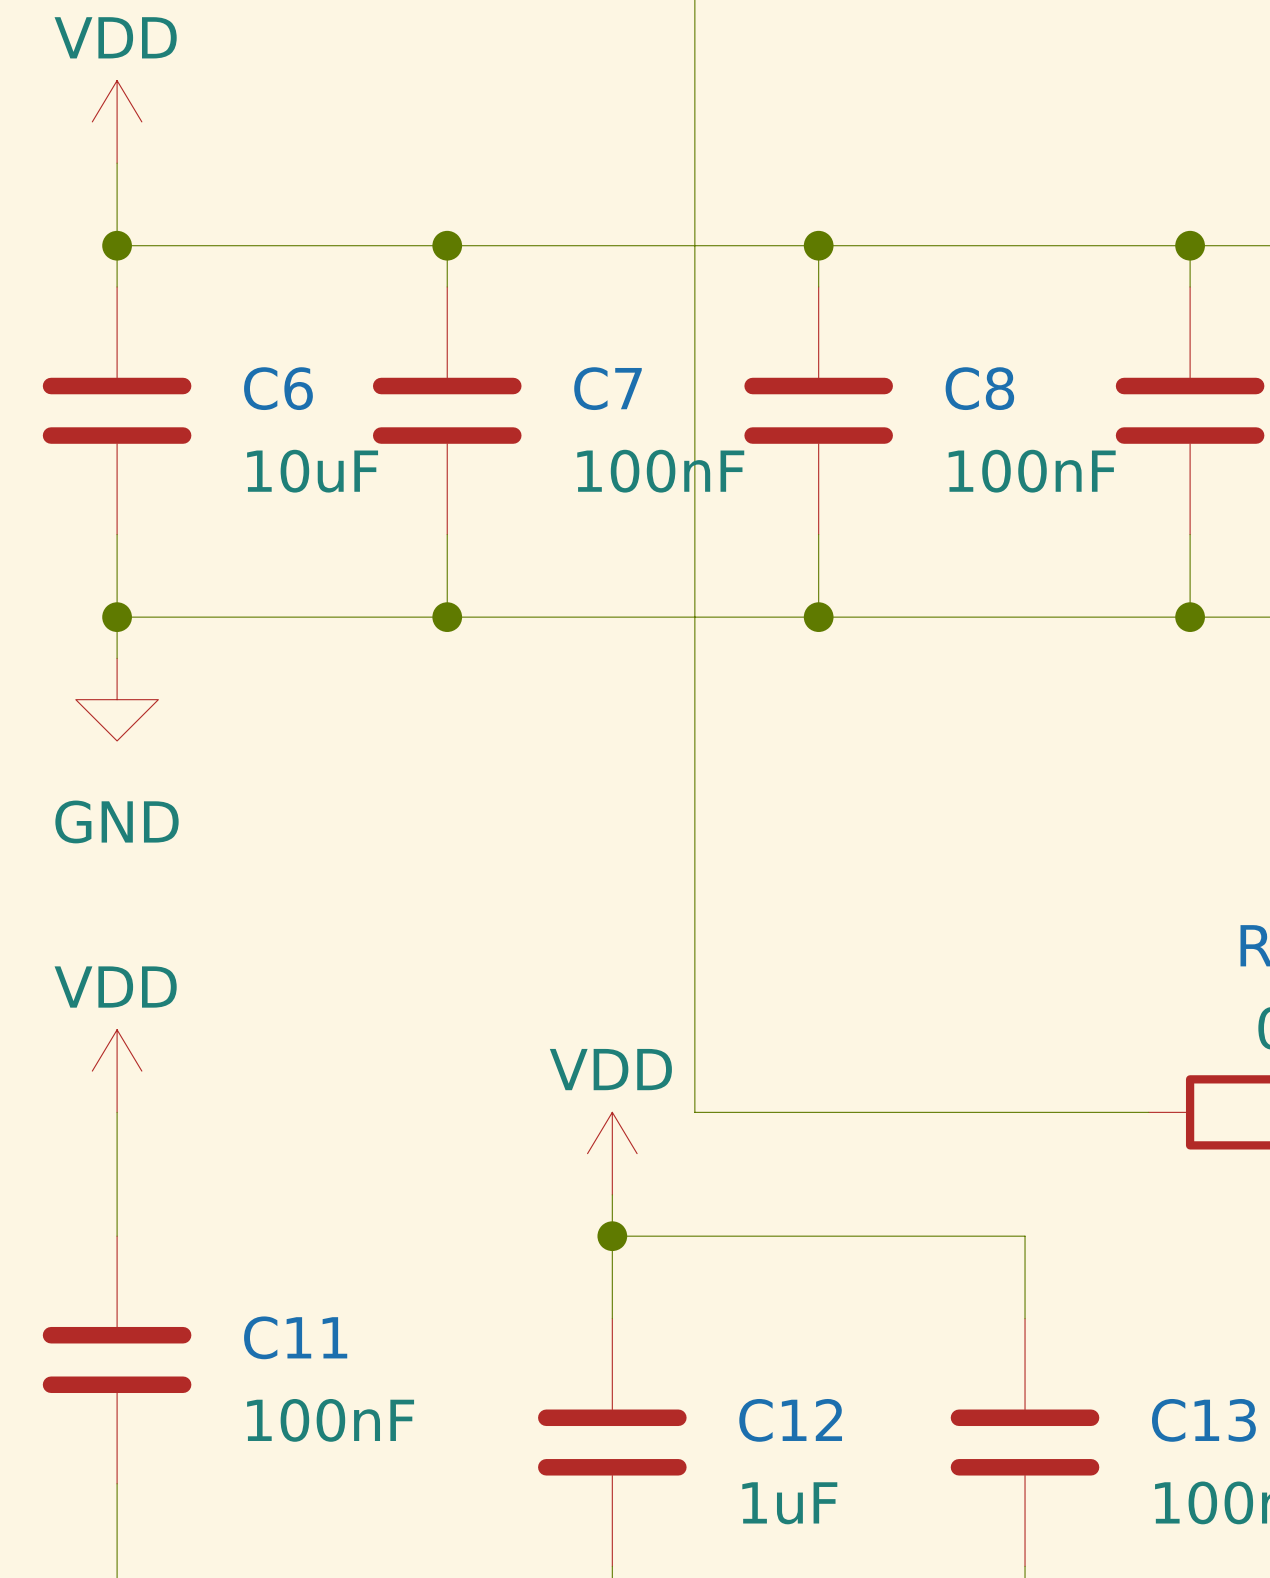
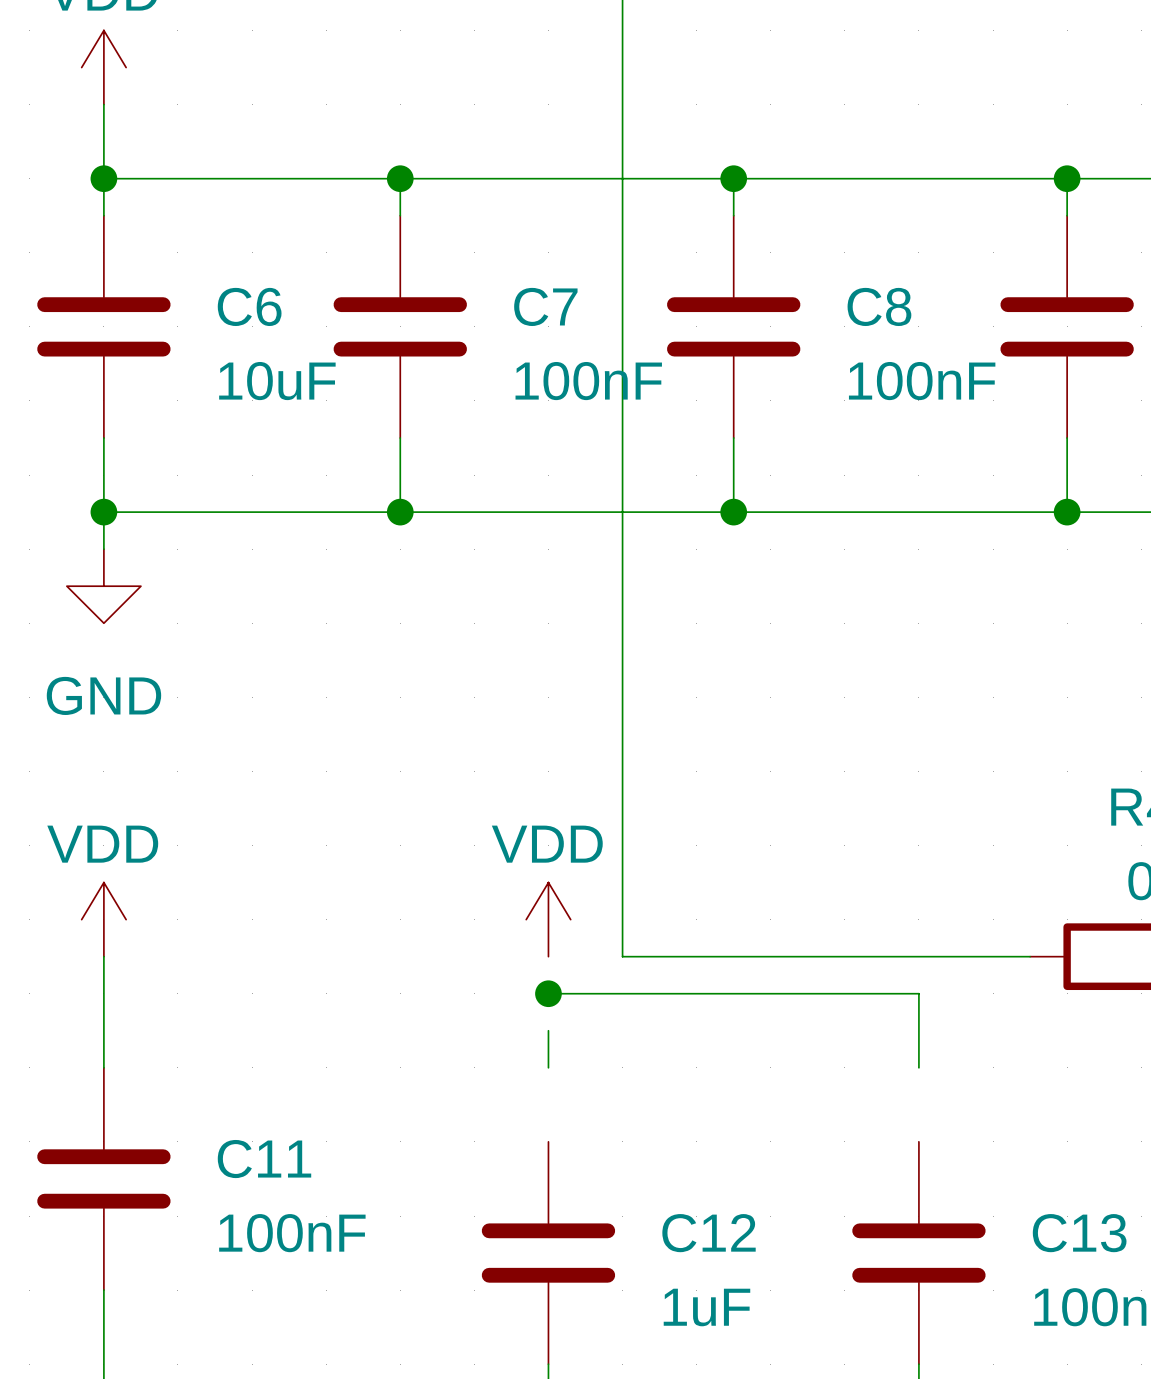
wire: none -> (548, 993) (918, 993) (918, 1067)
power symbol position: VDD (612, 1153) -> VDD (548, 919)
junction position: (612, 1236) -> (548, 993)
wire: (612, 1318) (612, 1236) (1025, 1236) (1025, 1318) -> none

